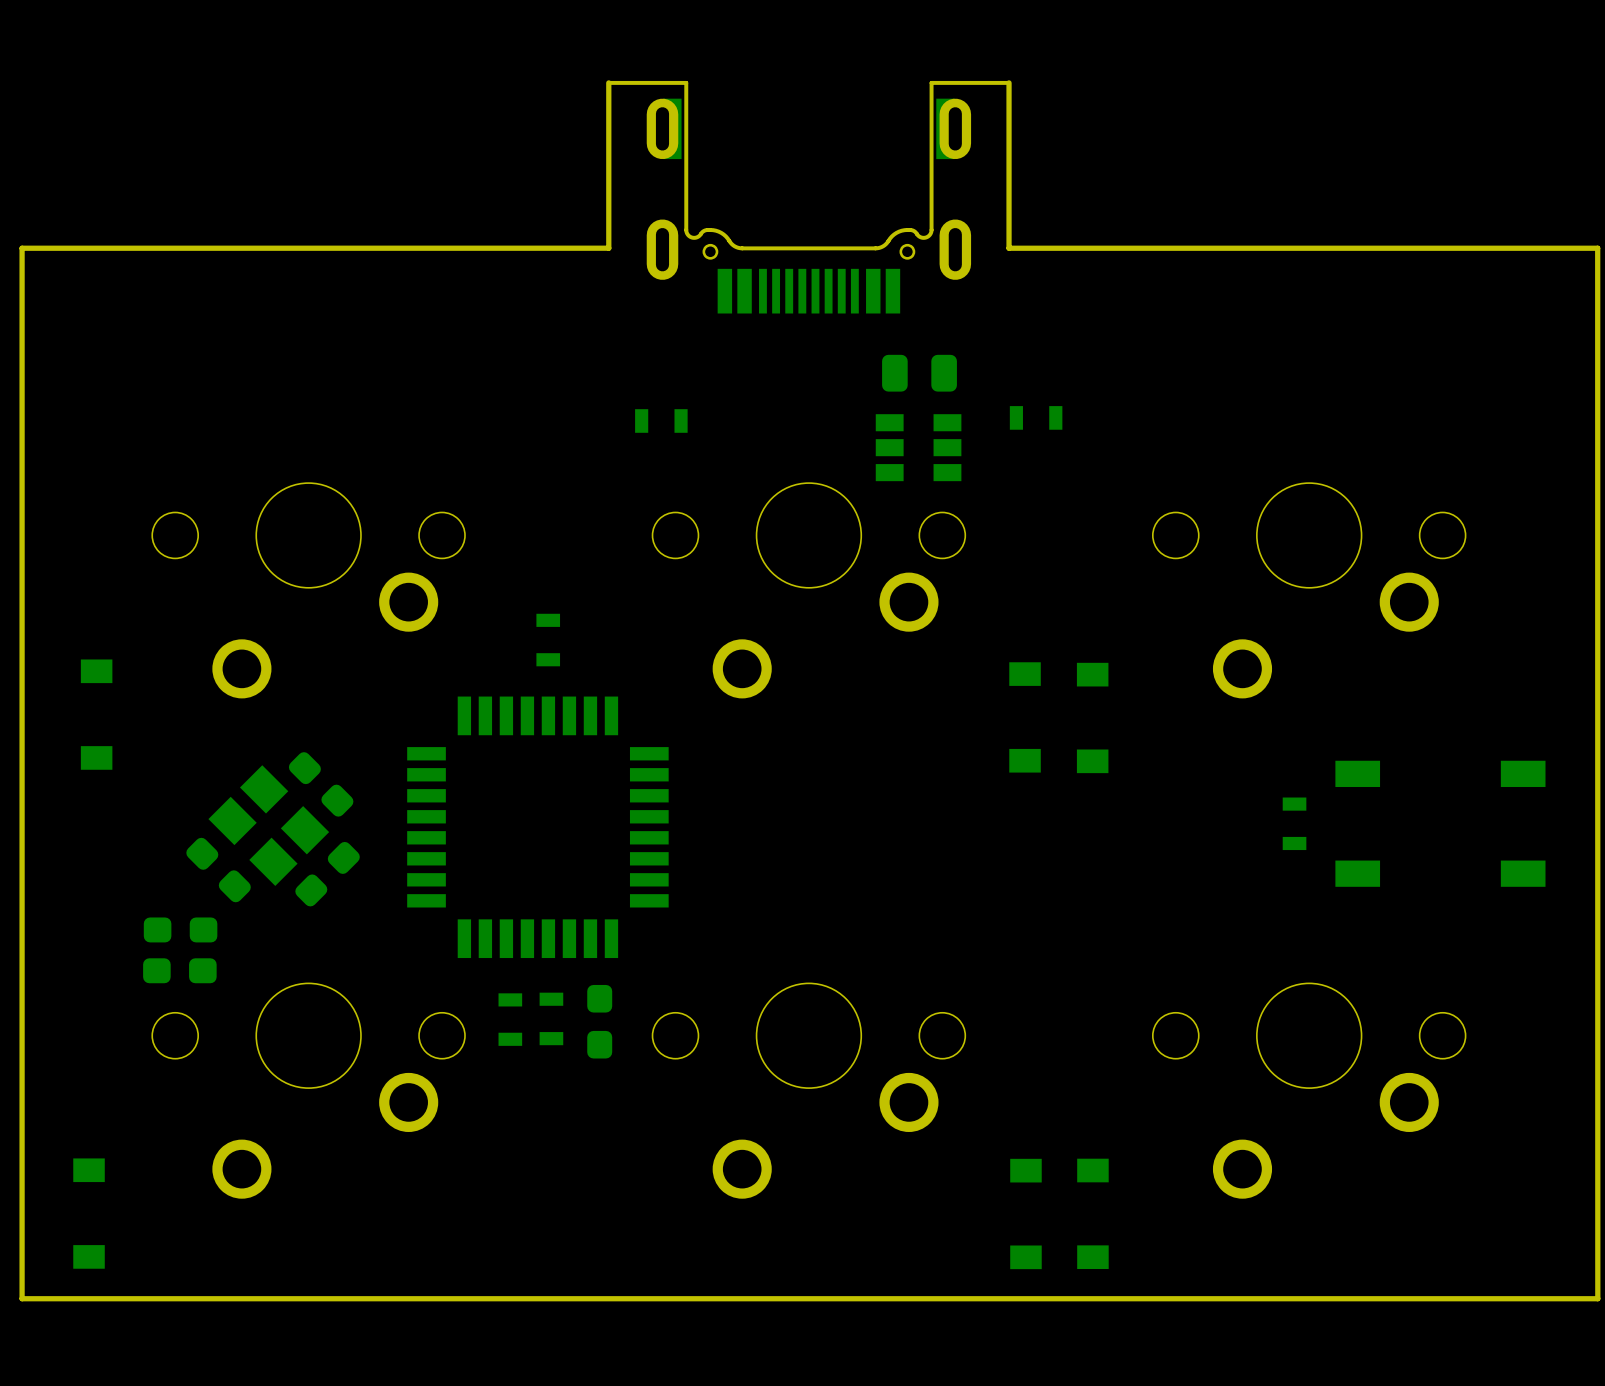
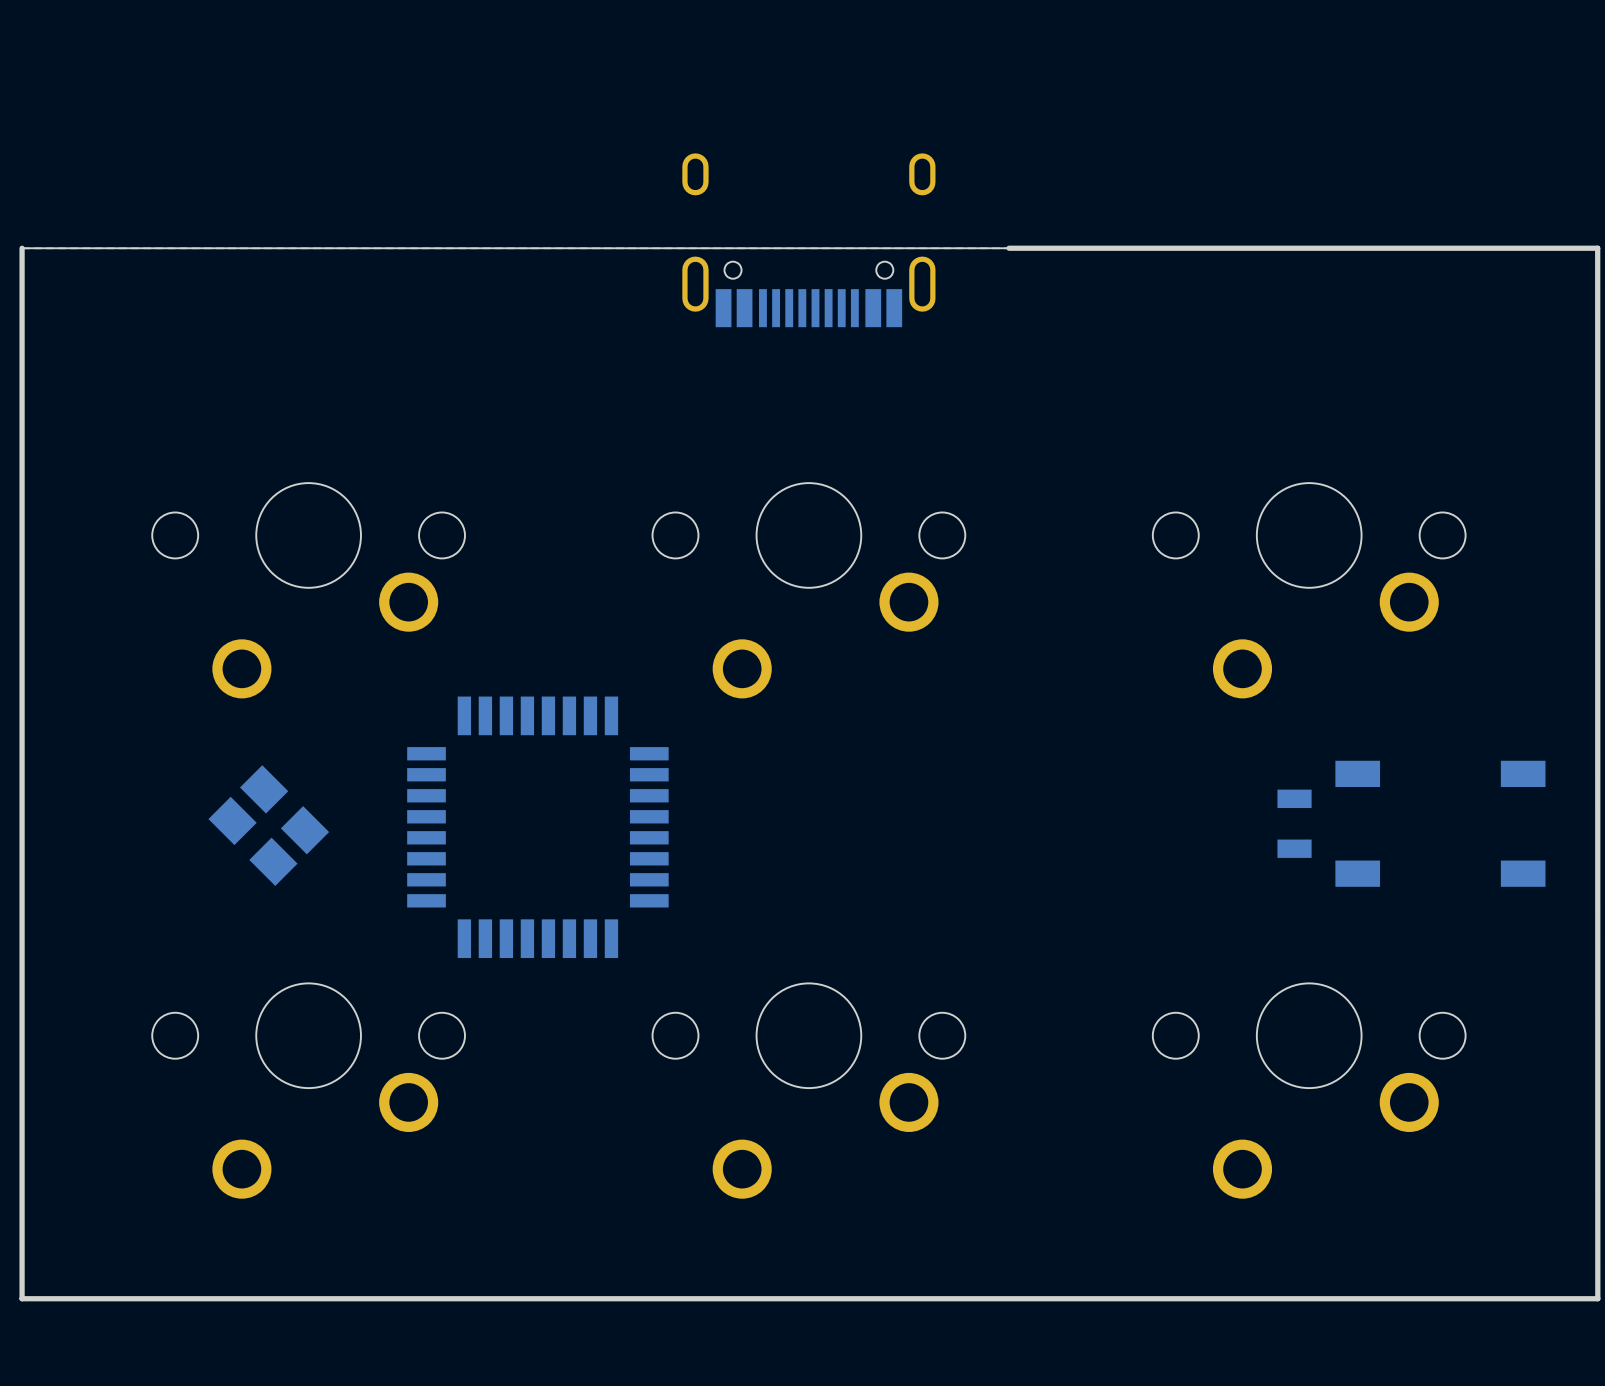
board edge: (608, 82) (608, 248) (22, 248) -> (1009, 248) (22, 248)
board edge: (1009, 82) (1009, 248) -> none
part: (808, 197) -> none
part: none -> (808, 240)
part: (919, 373) -> none
part: (1036, 417) -> none
part: (661, 420) -> none
part: (918, 447) -> none
part: (548, 640) -> none
part: (96, 714) -> none
part: (1025, 717) -> none
part: (1092, 717) -> none
part: (321, 784) -> none
part footprint: [1282, 797, 1307, 851] -> [1277, 789, 1312, 858]
part: (218, 870) -> none
part: (327, 874) -> none
part: (180, 929) -> none
part: (179, 970) -> none
part: (551, 1018) -> none
part: (510, 1019) -> none
part: (599, 1021) -> none
part: (89, 1213) -> none
part: (1025, 1213) -> none
part: (1092, 1213) -> none

